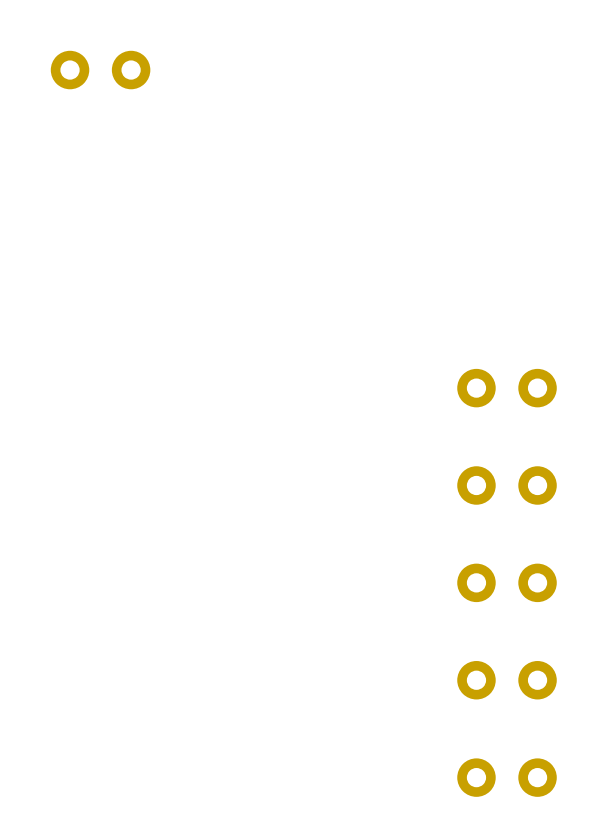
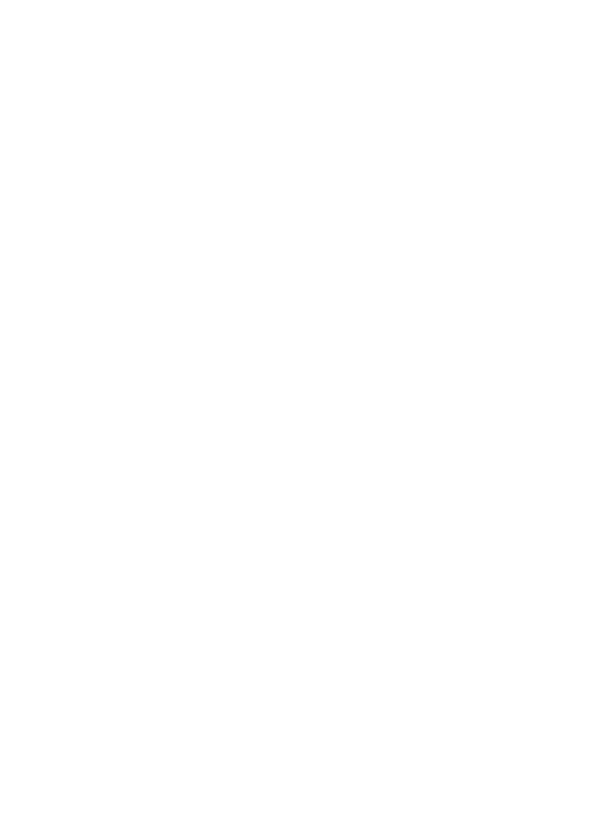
part: (100, 70) -> none
part: (507, 388) -> none
part: (507, 485) -> none
part: (507, 582) -> none
part: (507, 680) -> none
part: (507, 777) -> none

